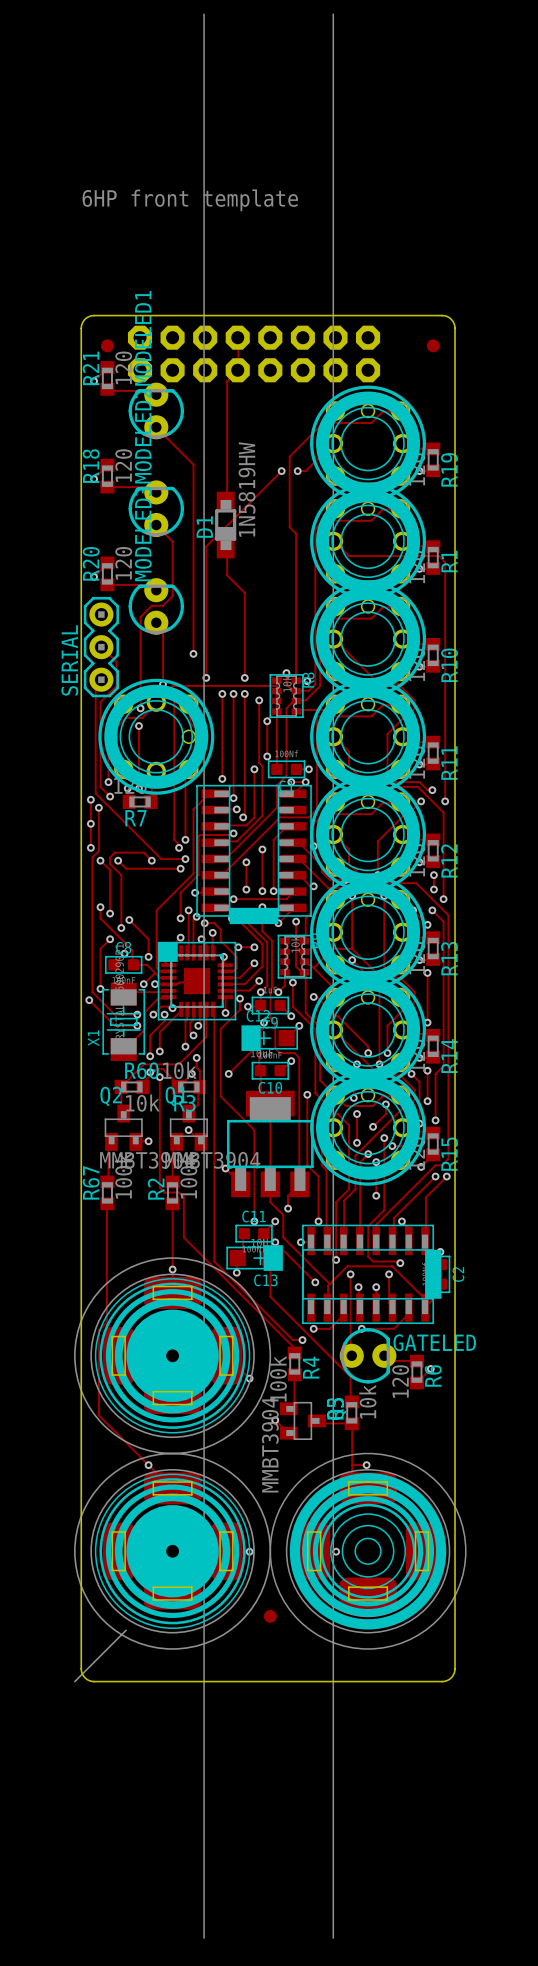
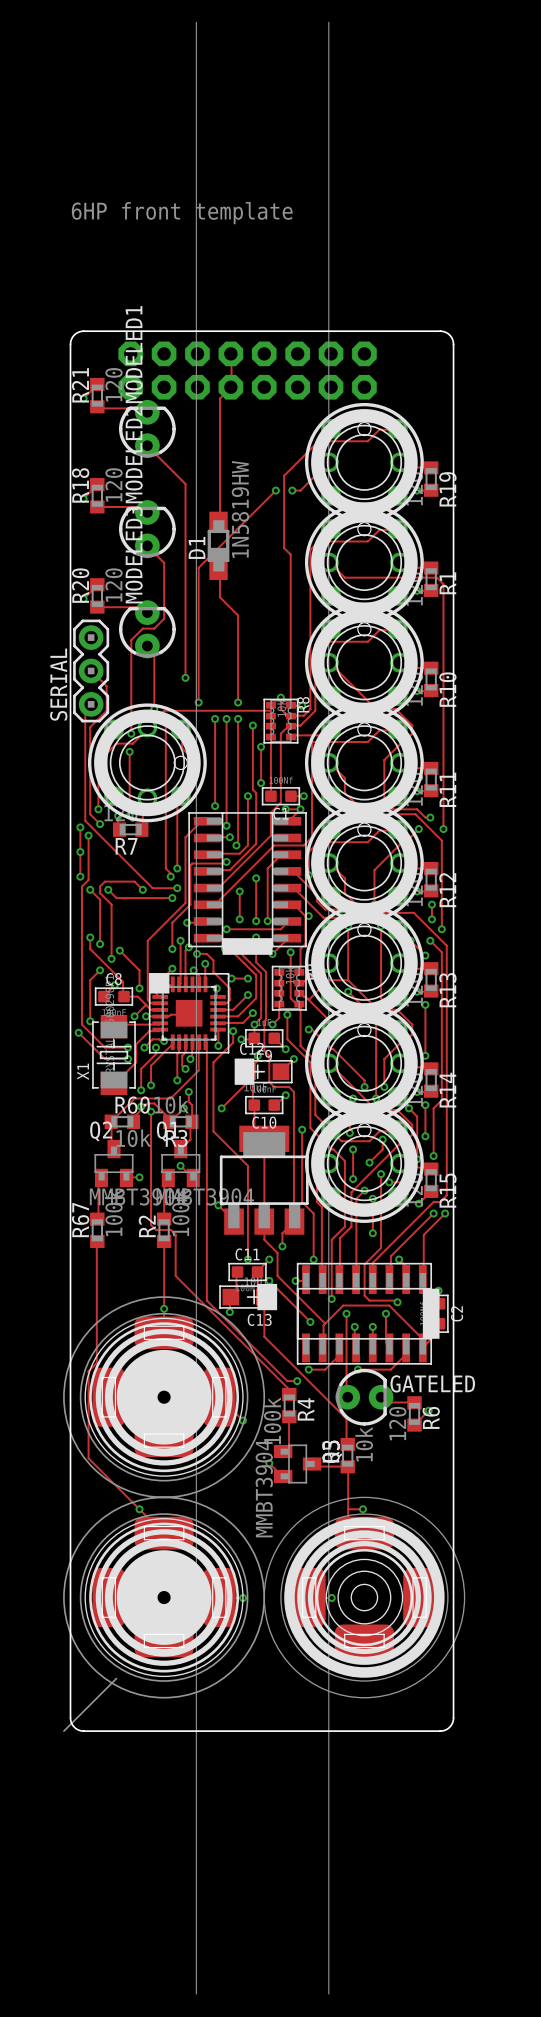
part: (107, 345) -> none
part: (433, 345) -> none
part: (270, 1616) -> none

